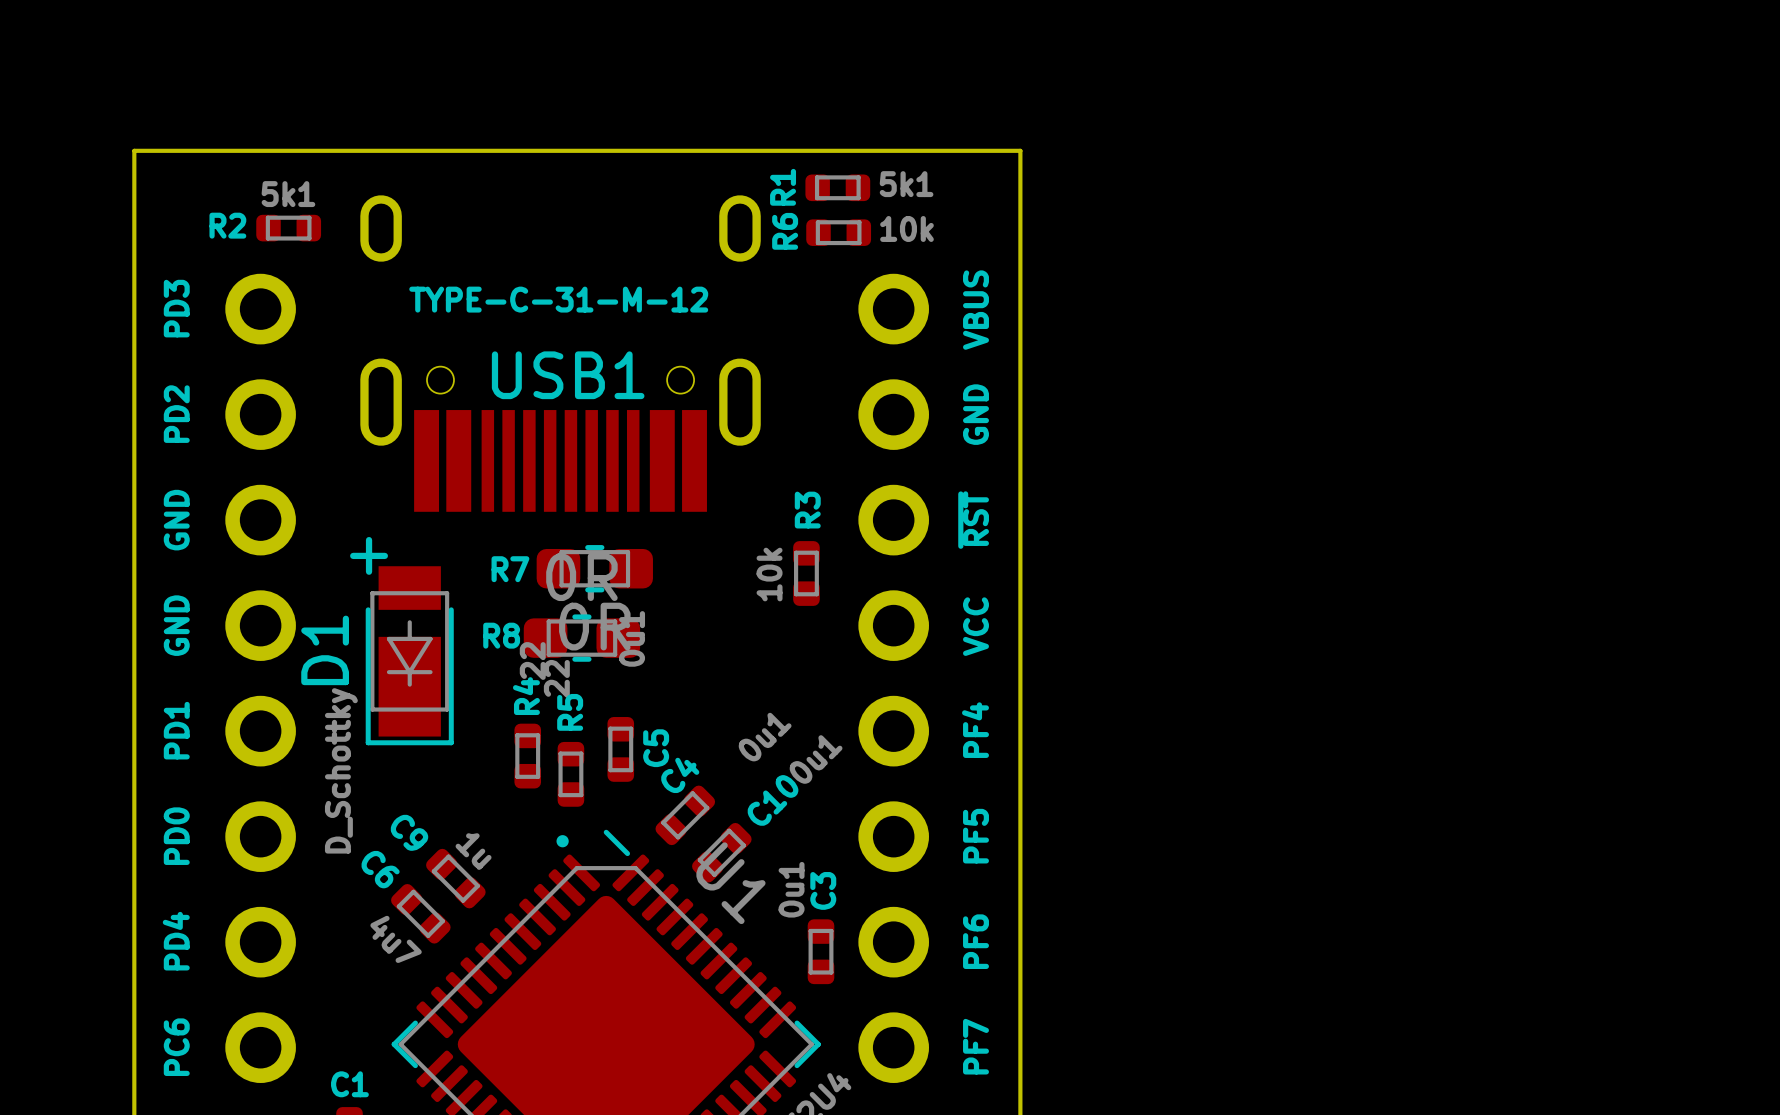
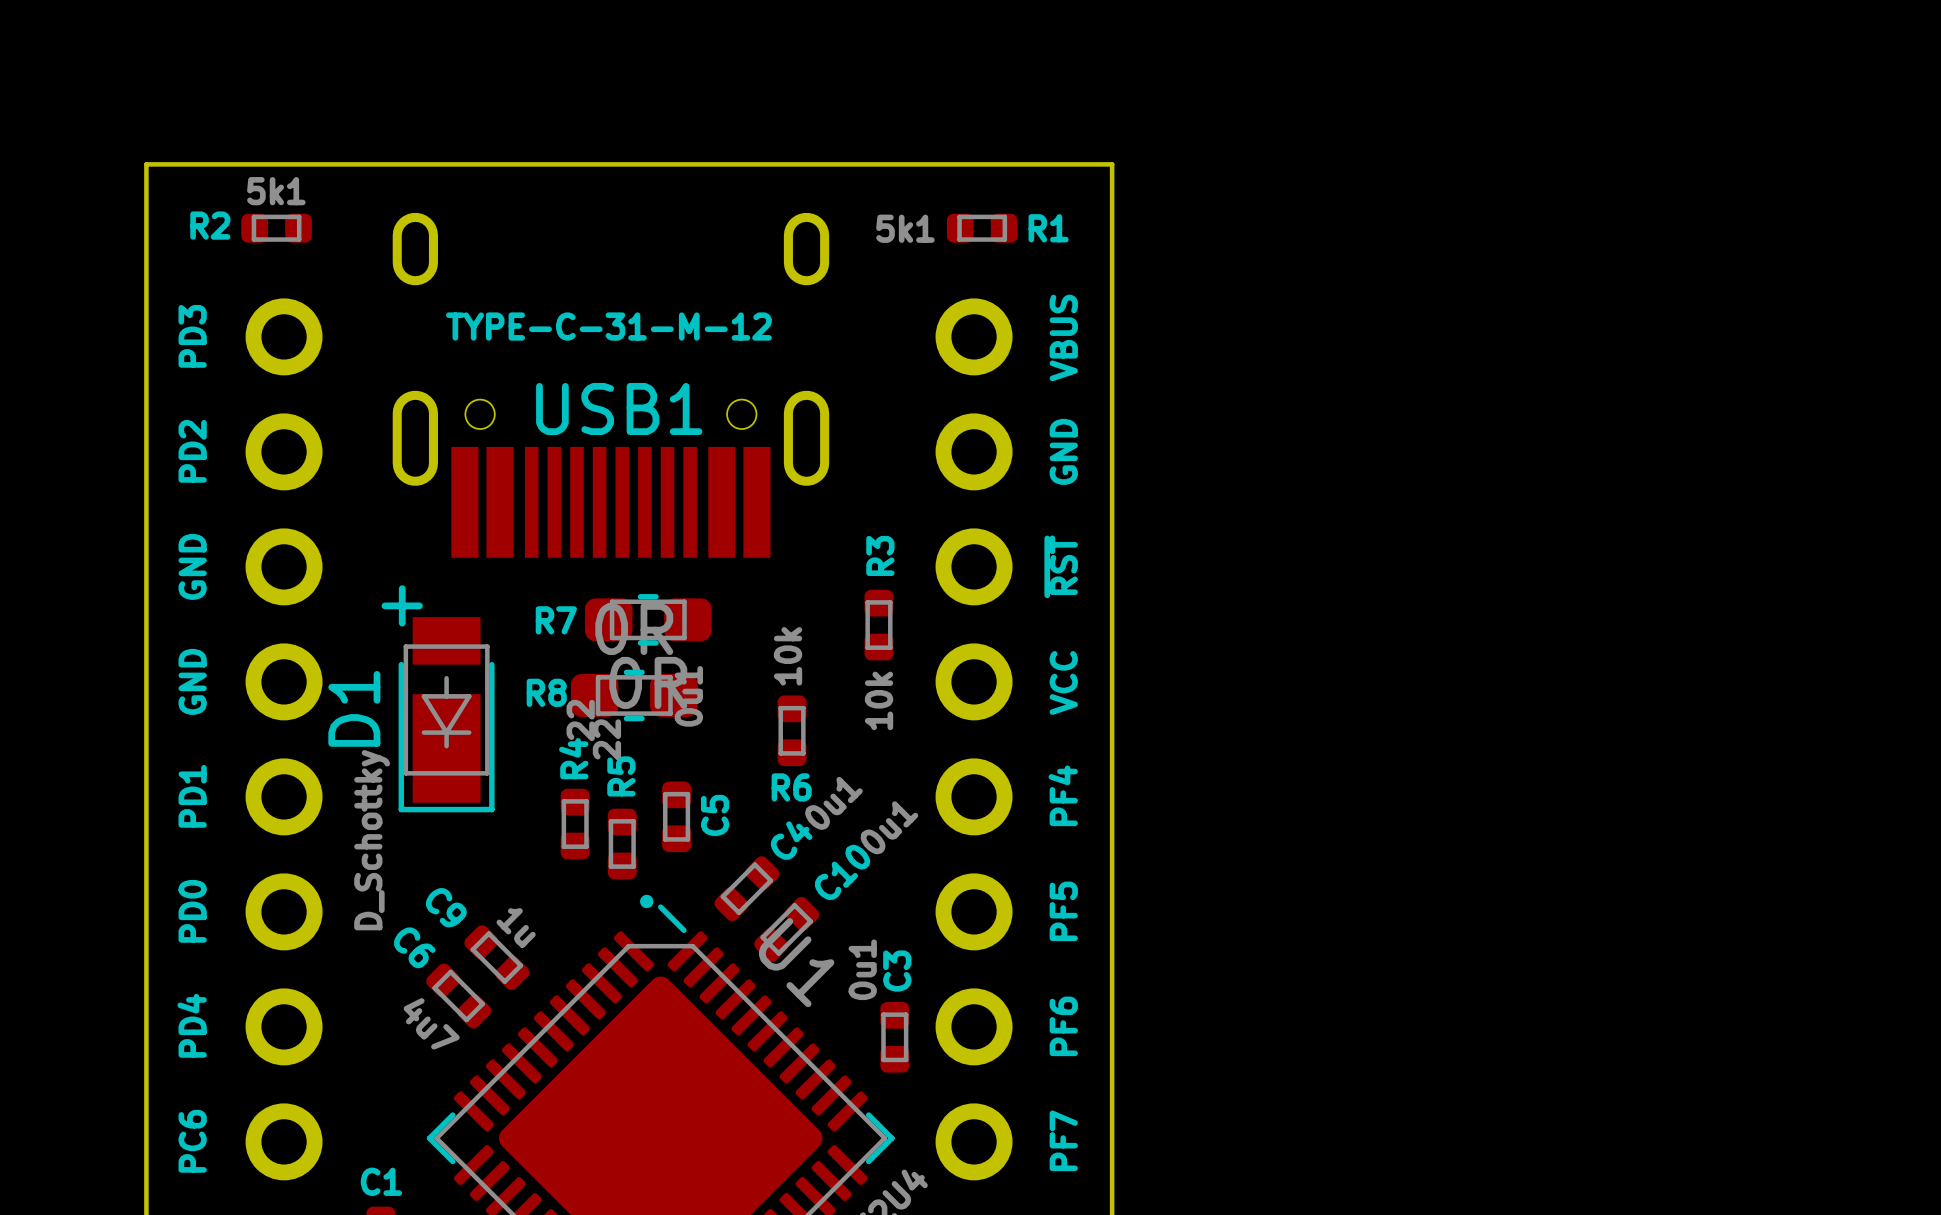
R1 value position: 5k1 (906, 184) -> 5k1 (905, 228)
R1 name rotation: 0° (783, 187) -> 90° clockwise (1048, 228)
R1 name position: R1 (783, 187) -> R1 (1048, 228)
R1 position: (837, 187) -> (982, 228)
R2 position: (288, 228) -> (276, 228)
R6 value position: 10k (906, 228) -> 10k (788, 656)
R6 rotation: 0° (838, 232) -> 90° clockwise (792, 730)
R6 position: (838, 232) -> (792, 730)
R3 value position: 10k (769, 574) -> 10k (879, 700)
C4 name position: C4 (680, 775) -> C4 (791, 840)
drawing position: (562, 841) -> (646, 901)

